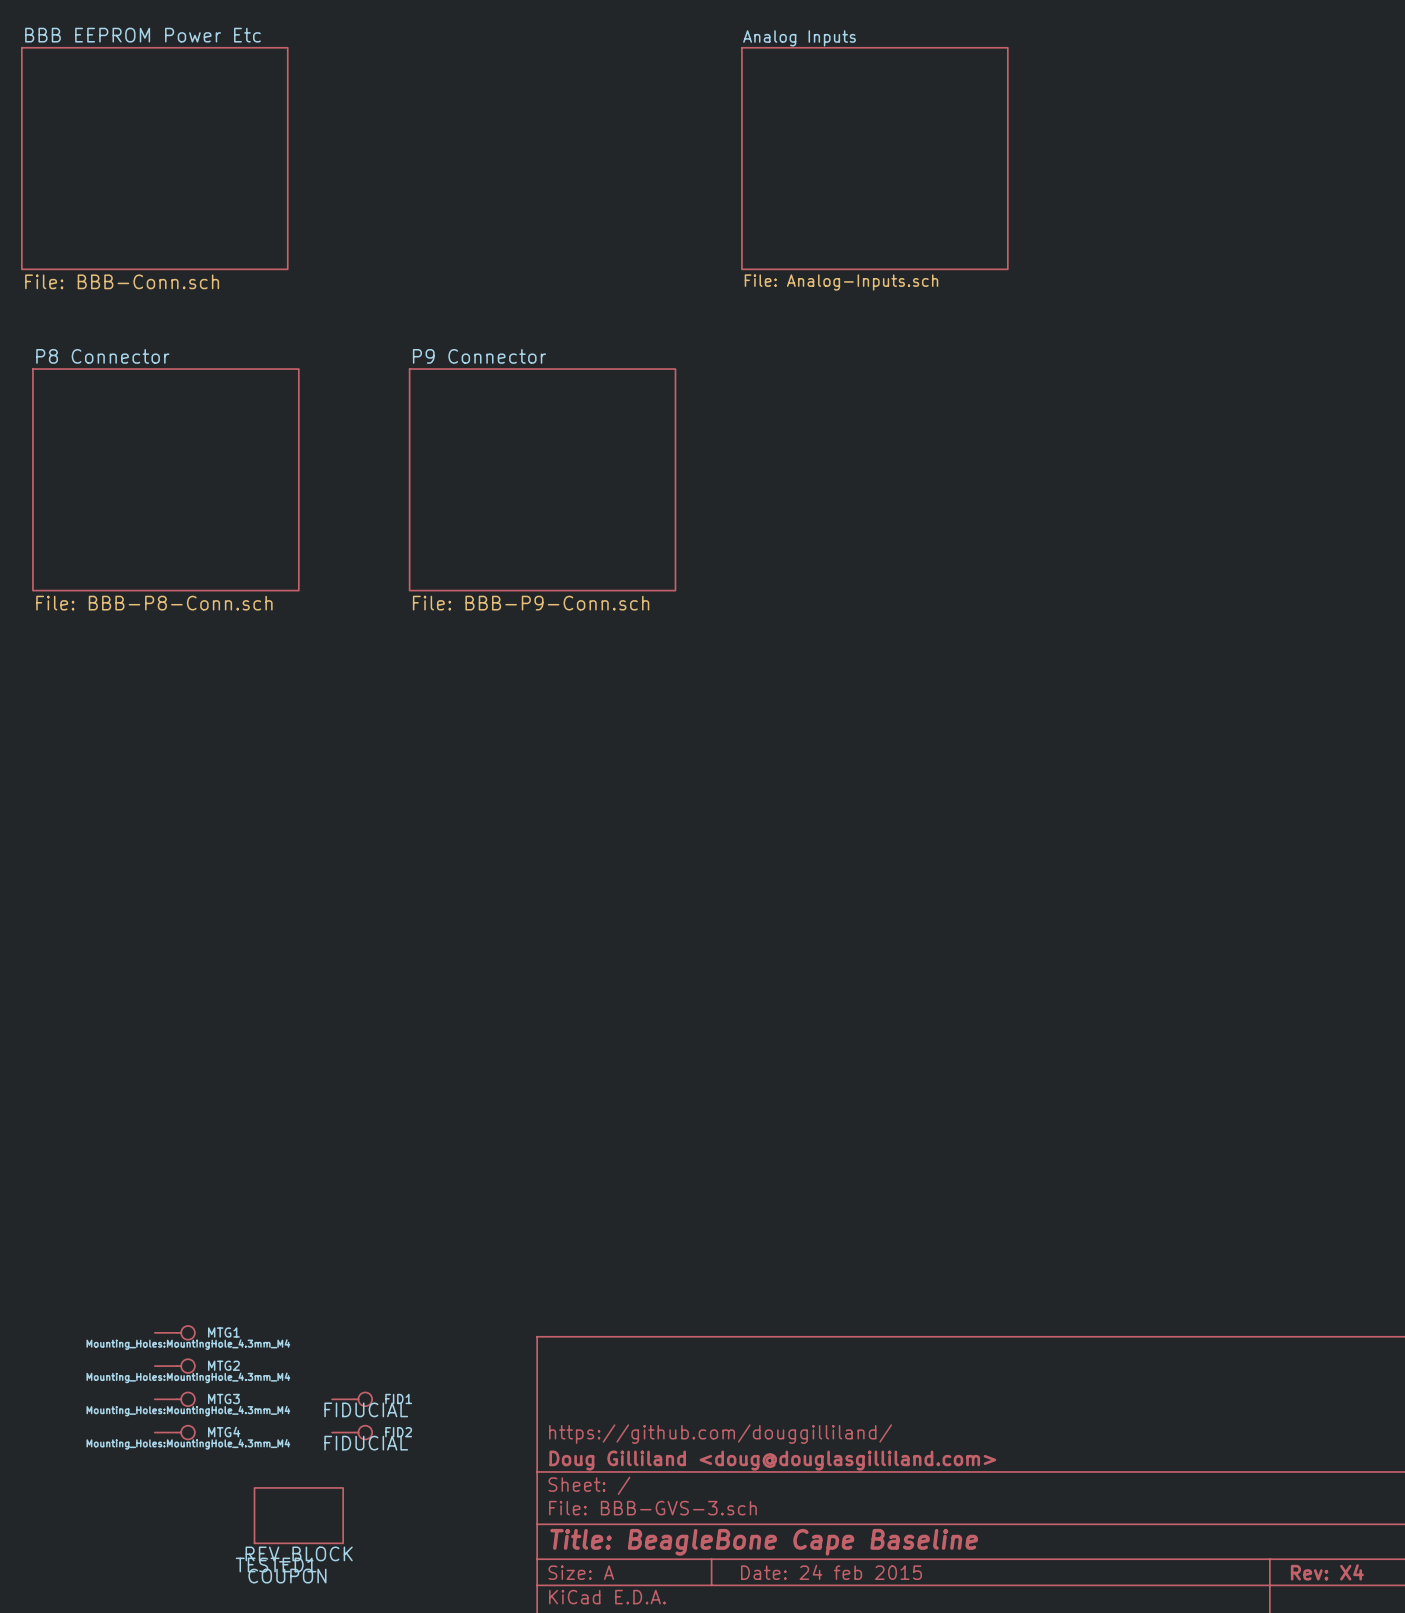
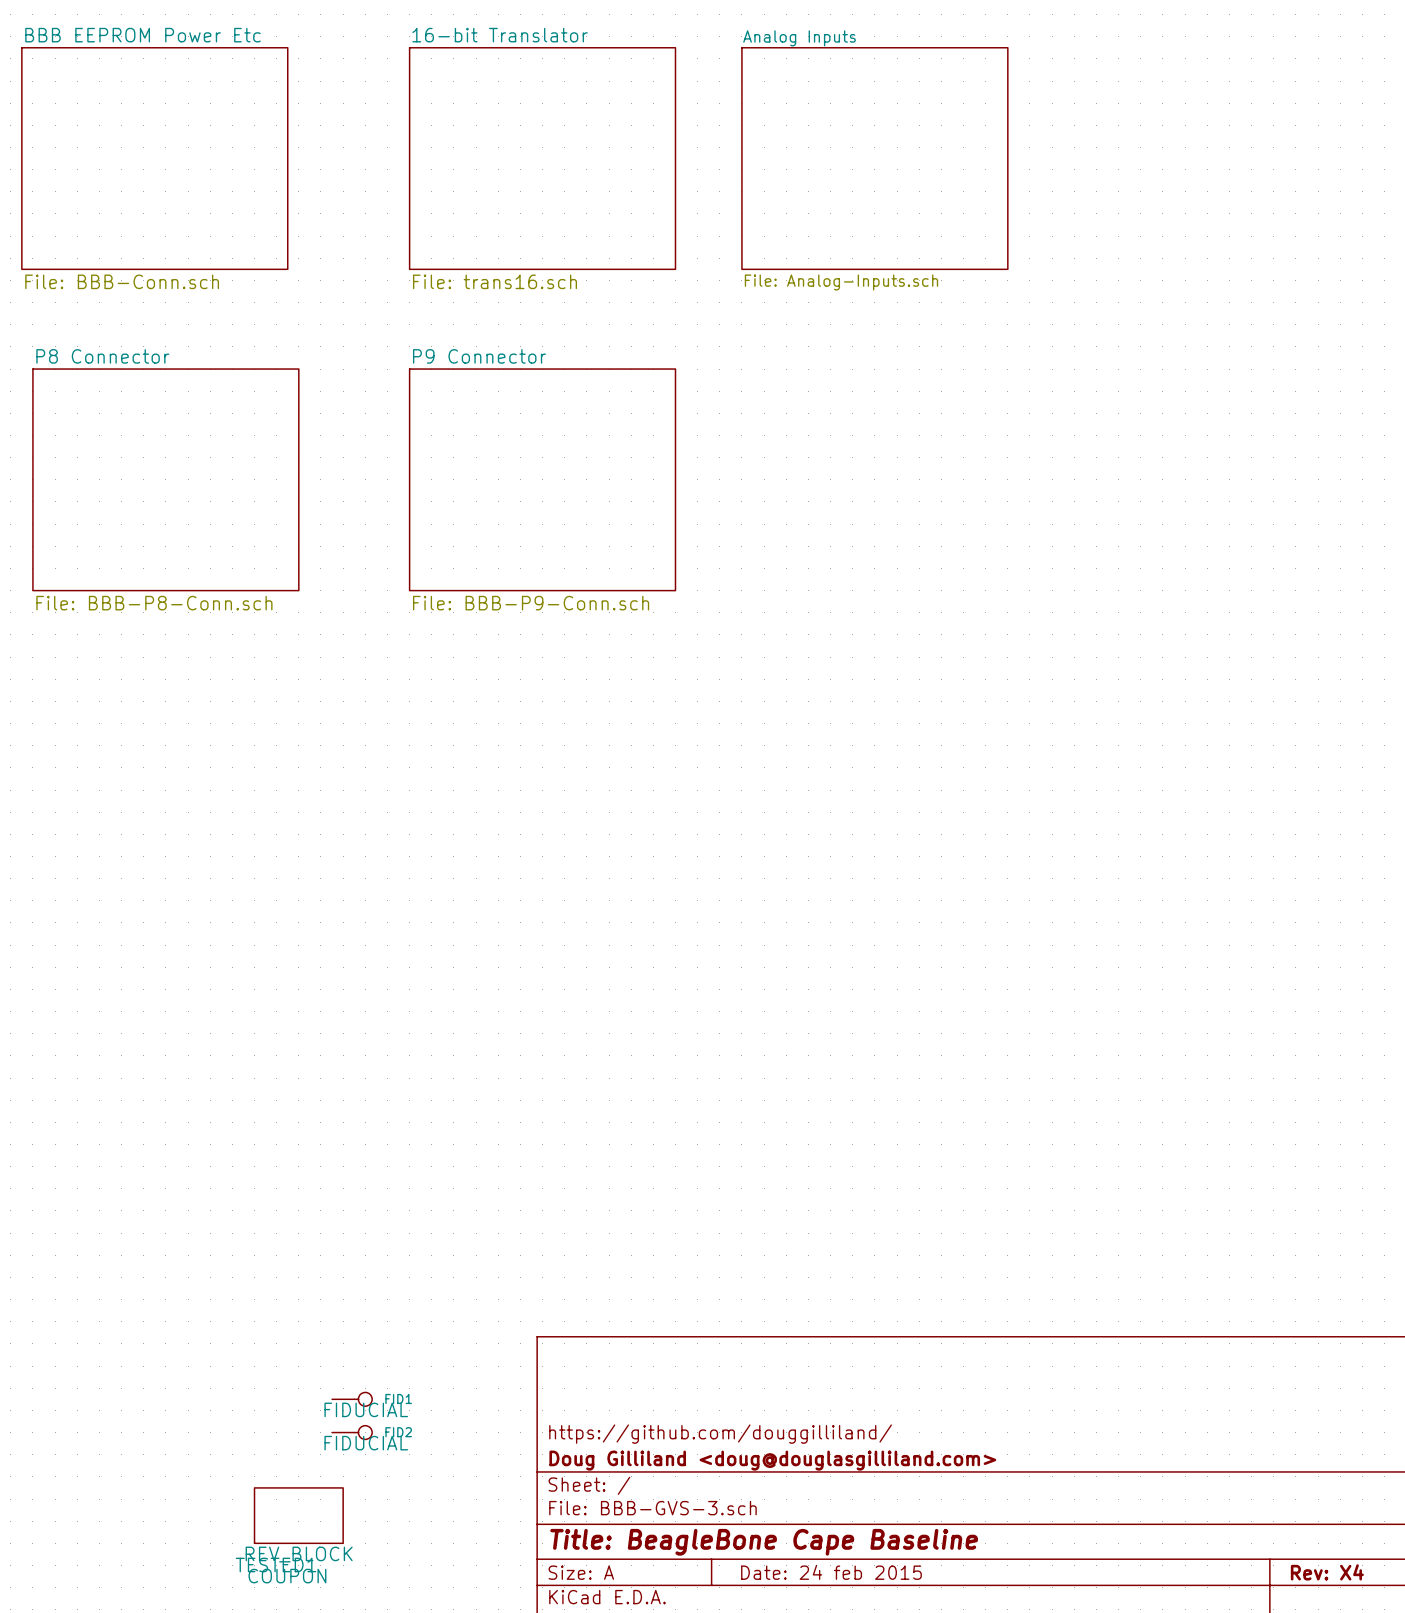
sheet 16-bit Translator: none -> File: trans16.sch (542, 158)
MTG1: (174, 1332) -> none
MTG2: (174, 1366) -> none
MTG3: (174, 1399) -> none
MTG4: (174, 1432) -> none

